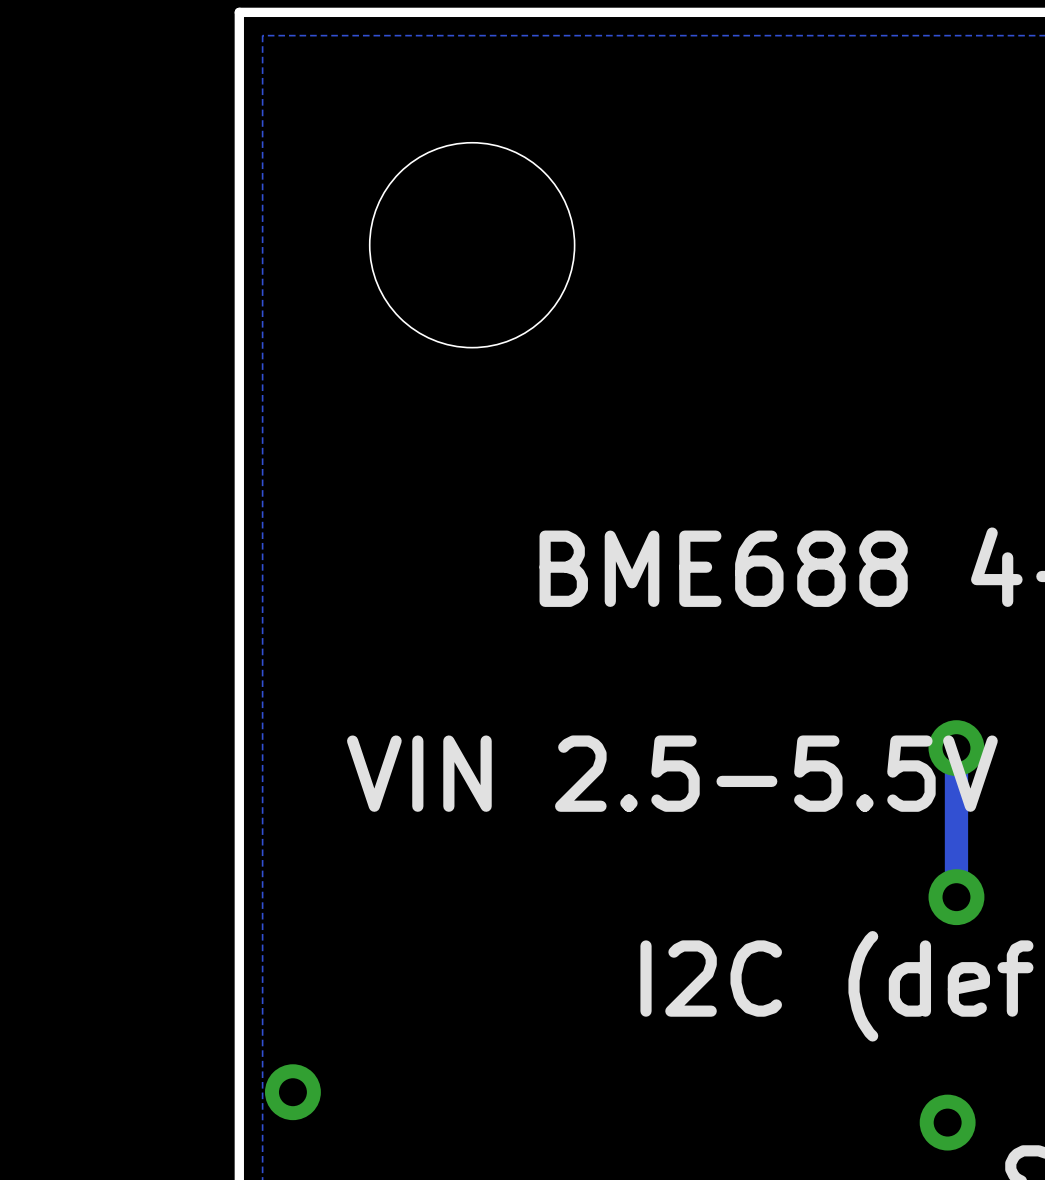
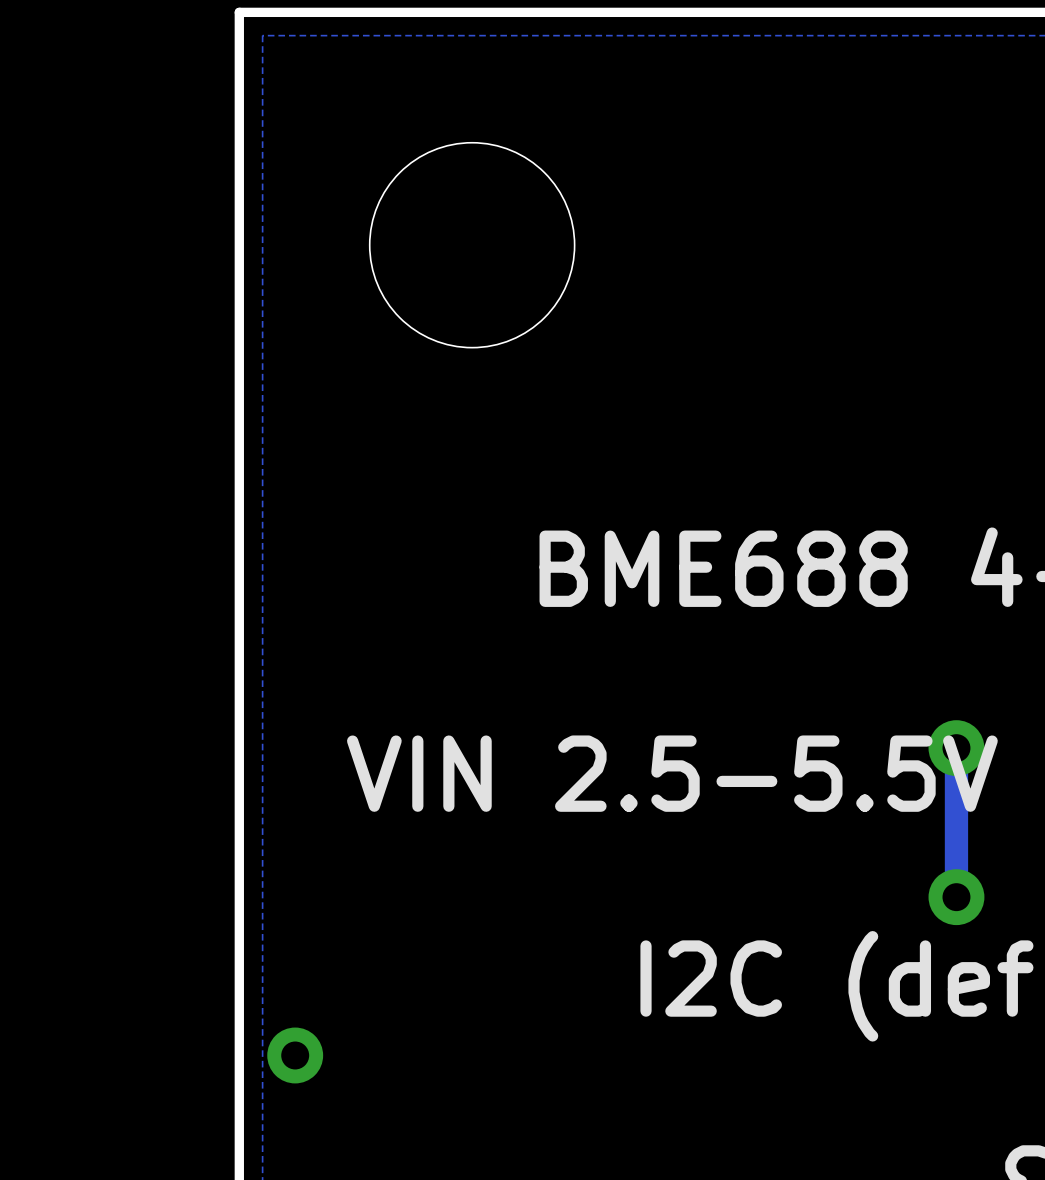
via position: (292, 1092) -> (295, 1055)
via: (947, 1122) -> none

